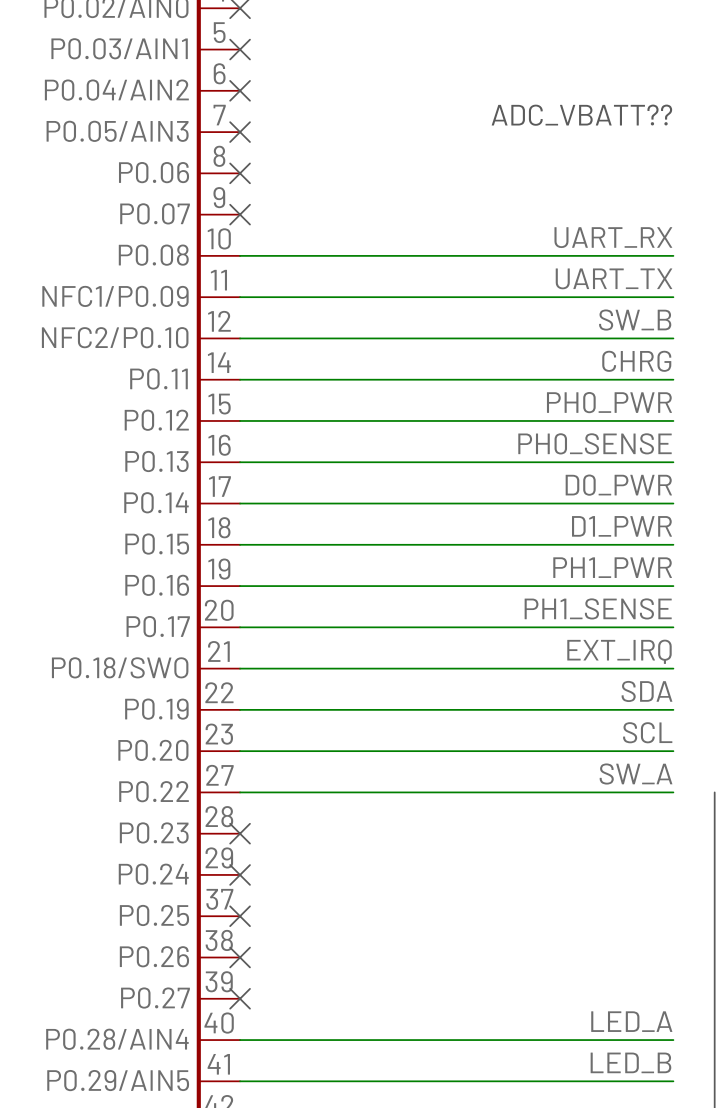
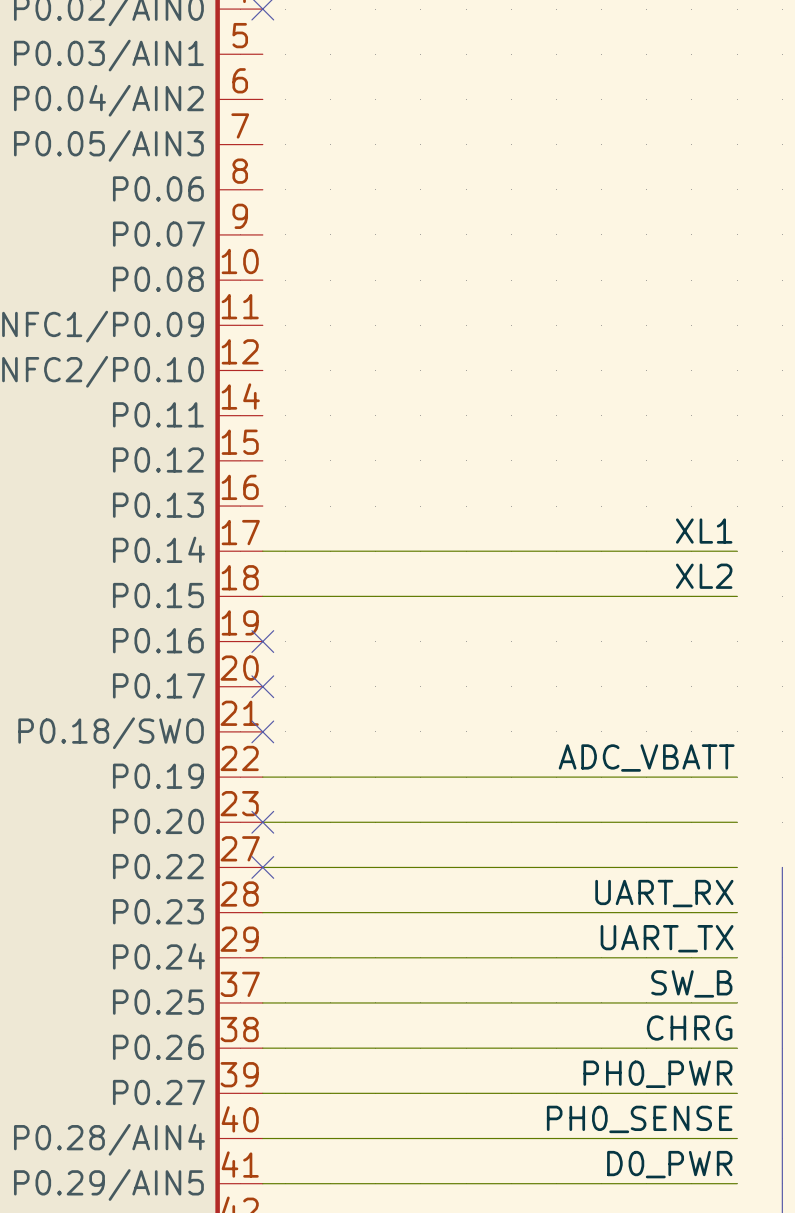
no-connect mark: (240, 49) -> none
no-connect mark: (240, 90) -> none
text: ADC_VBATT?? (581, 115) -> none
no-connect mark: (240, 132) -> none
no-connect mark: (240, 173) -> none
no-connect mark: (240, 214) -> none
label: UART_RX (613, 237) -> none
wire: (240, 255) (673, 255) -> none
label: UART_TX (614, 278) -> none
wire: (240, 297) (673, 297) -> none
label: SW_B (635, 320) -> none
wire: (240, 338) (673, 338) -> none
label: CHRG (636, 361) -> none
wire: (240, 379) (673, 379) -> none
label: PH0_PWR (609, 402) -> none
wire: (240, 420) (673, 420) -> none
label: PH0_SENSE (594, 443) -> none
wire: (240, 462) (673, 462) -> none
label: D0_PWR (618, 485) -> XL1 (704, 531)
label: D1_PWR (621, 526) -> XL2 (704, 576)
label: PH1_PWR (612, 567) -> none
wire: (240, 586) (673, 586) -> (262, 912) (737, 912)
no-connect mark: none -> (262, 641)
label: PH1_SENSE (598, 608) -> none
wire: (240, 627) (673, 627) -> (262, 957) (737, 957)
no-connect mark: none -> (262, 686)
label: EXT_IRQ (619, 651) -> none
wire: (240, 668) (673, 668) -> (262, 1002) (737, 1002)
no-connect mark: none -> (262, 731)
label: SDA (647, 691) -> ADC_VBATT (646, 758)
label: SCL (647, 732) -> none
no-connect mark: none -> (262, 822)
label: SW_A (636, 774) -> none
no-connect mark: none -> (262, 867)
label: none -> UART_RX (664, 893)
no-connect mark: (240, 833) -> none
label: none -> UART_TX (667, 938)
no-connect mark: (240, 874) -> none
label: none -> SW_B (691, 983)
no-connect mark: (240, 916) -> none
label: none -> CHRG (689, 1028)
wire: none -> (262, 1048) (737, 1048)
no-connect mark: (240, 957) -> none
label: none -> PH0_PWR (657, 1074)
wire: none -> (262, 1093) (737, 1093)
no-connect mark: (240, 998) -> none
label: LED_A (631, 1021) -> PH0_SENSE (639, 1119)
label: LED_B (630, 1062) -> D0_PWR (669, 1164)

